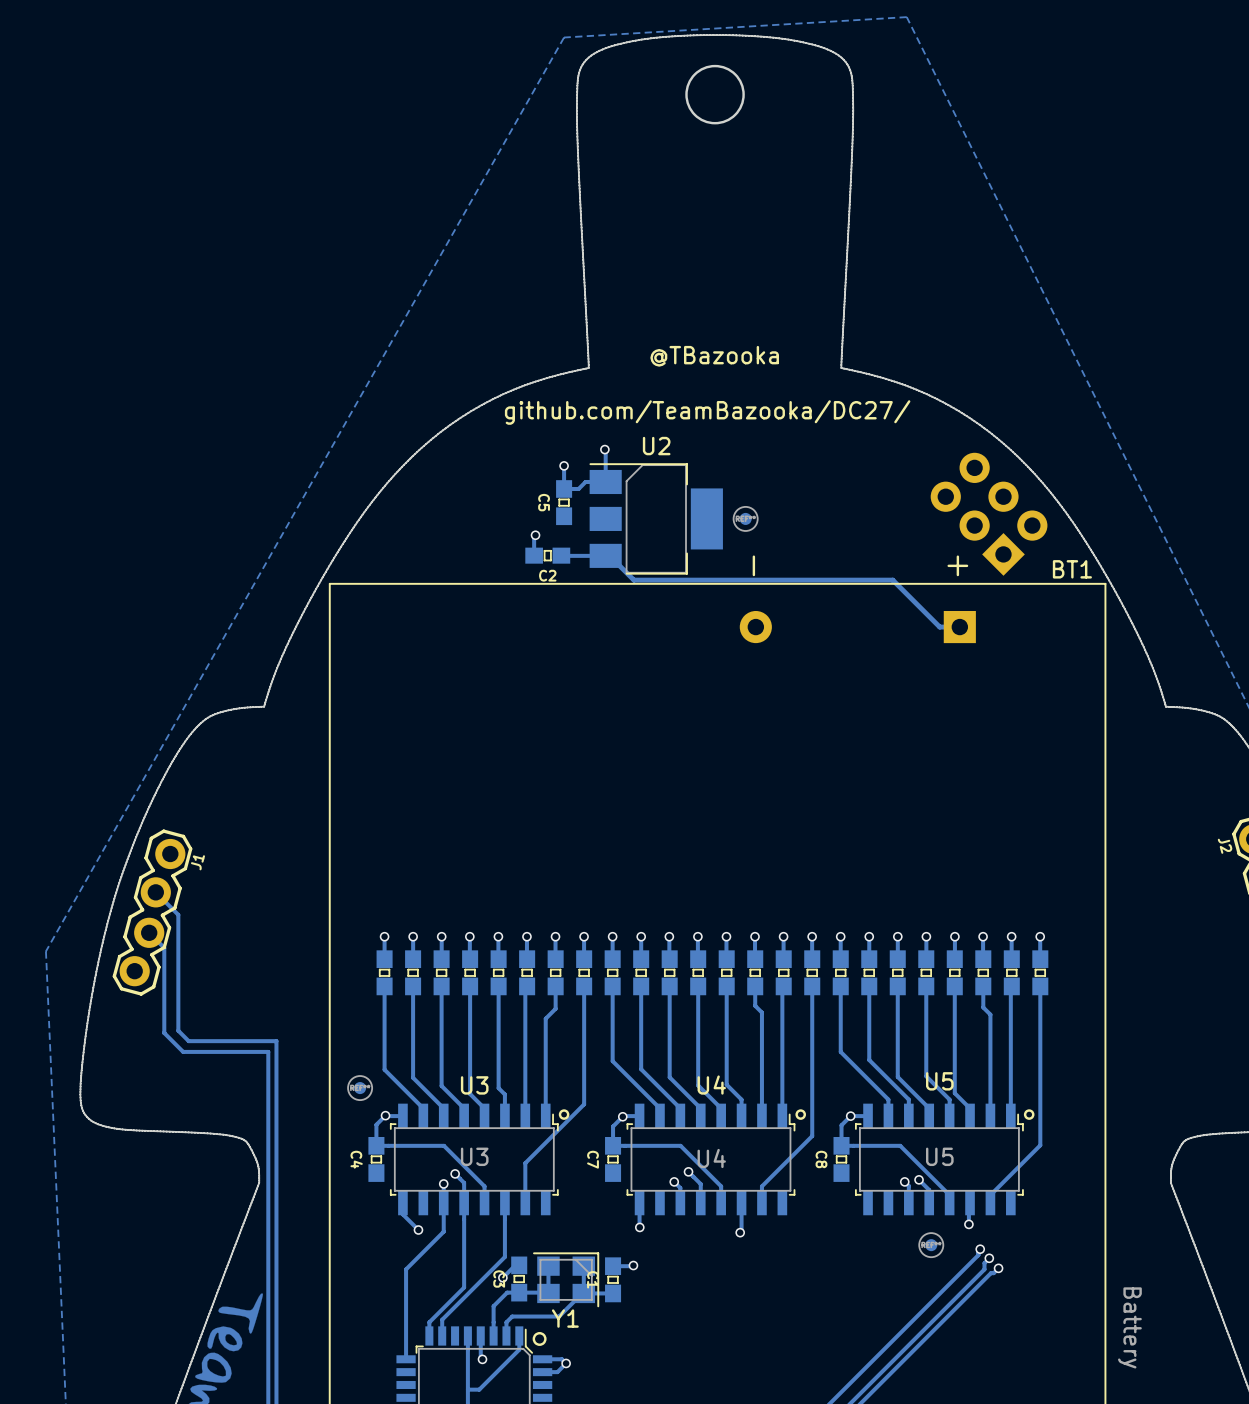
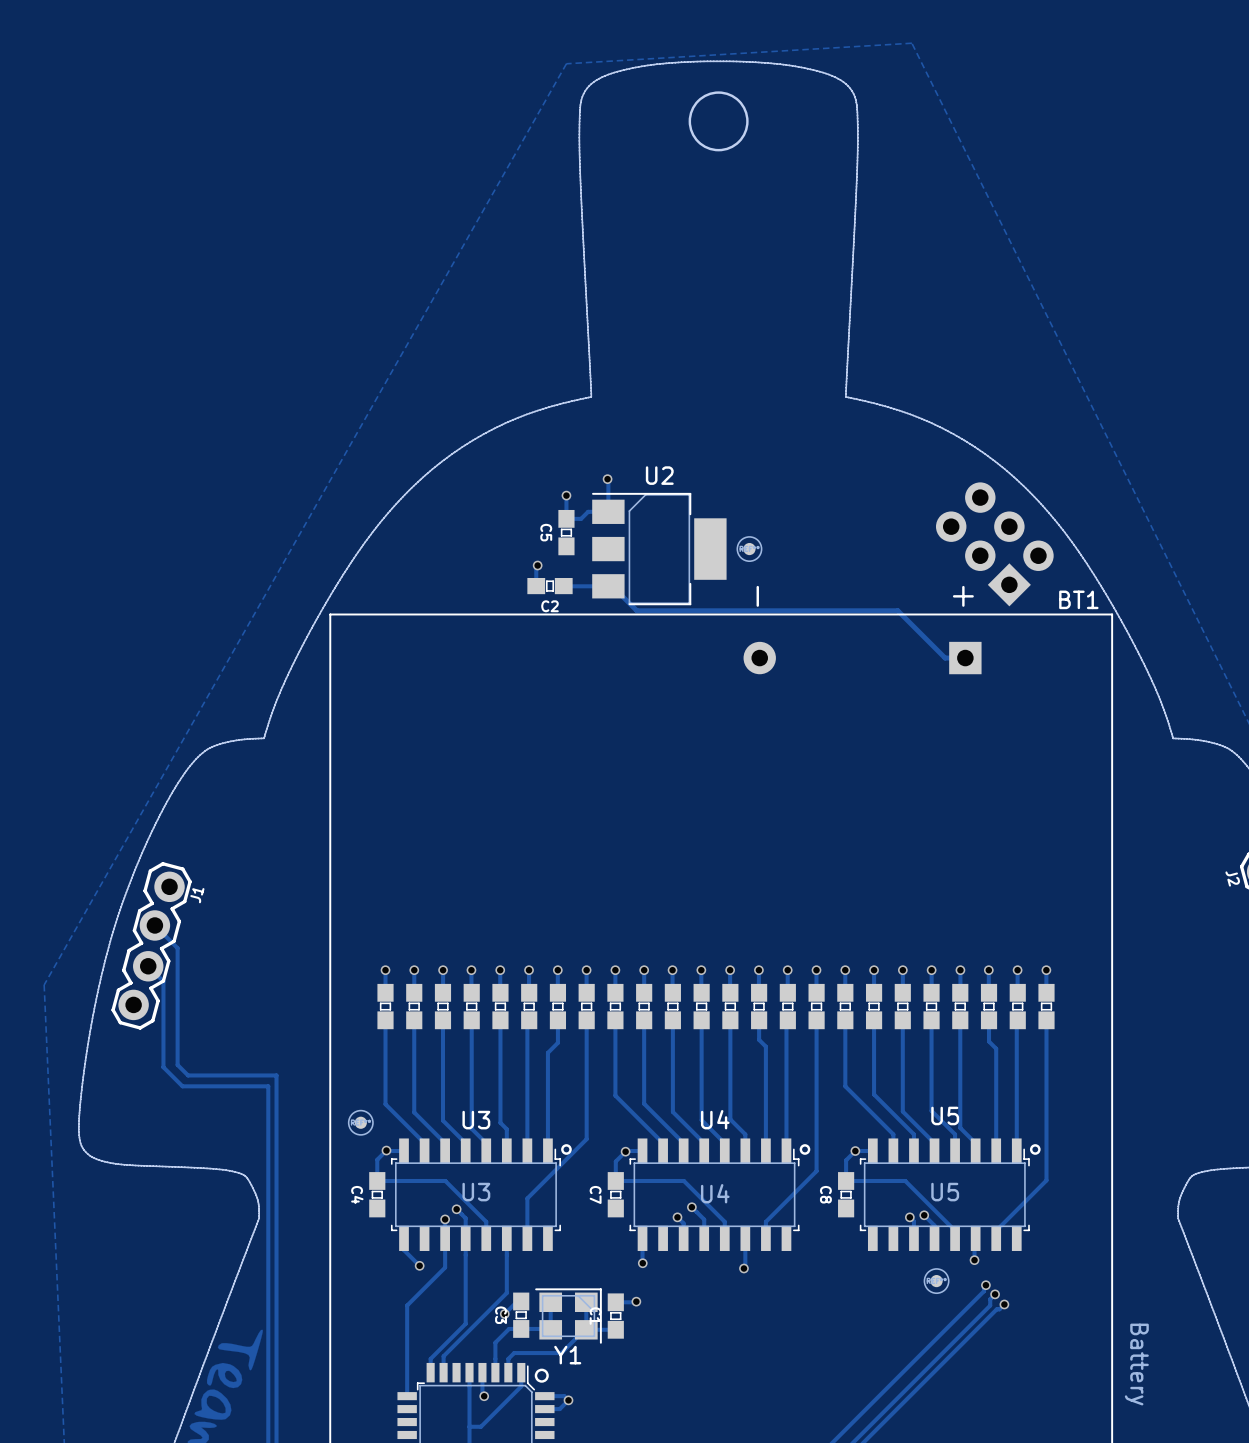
text: @TBazooka (714, 356) -> none
text: github.com/TeamBazooka/DC27/ (707, 412) -> none

